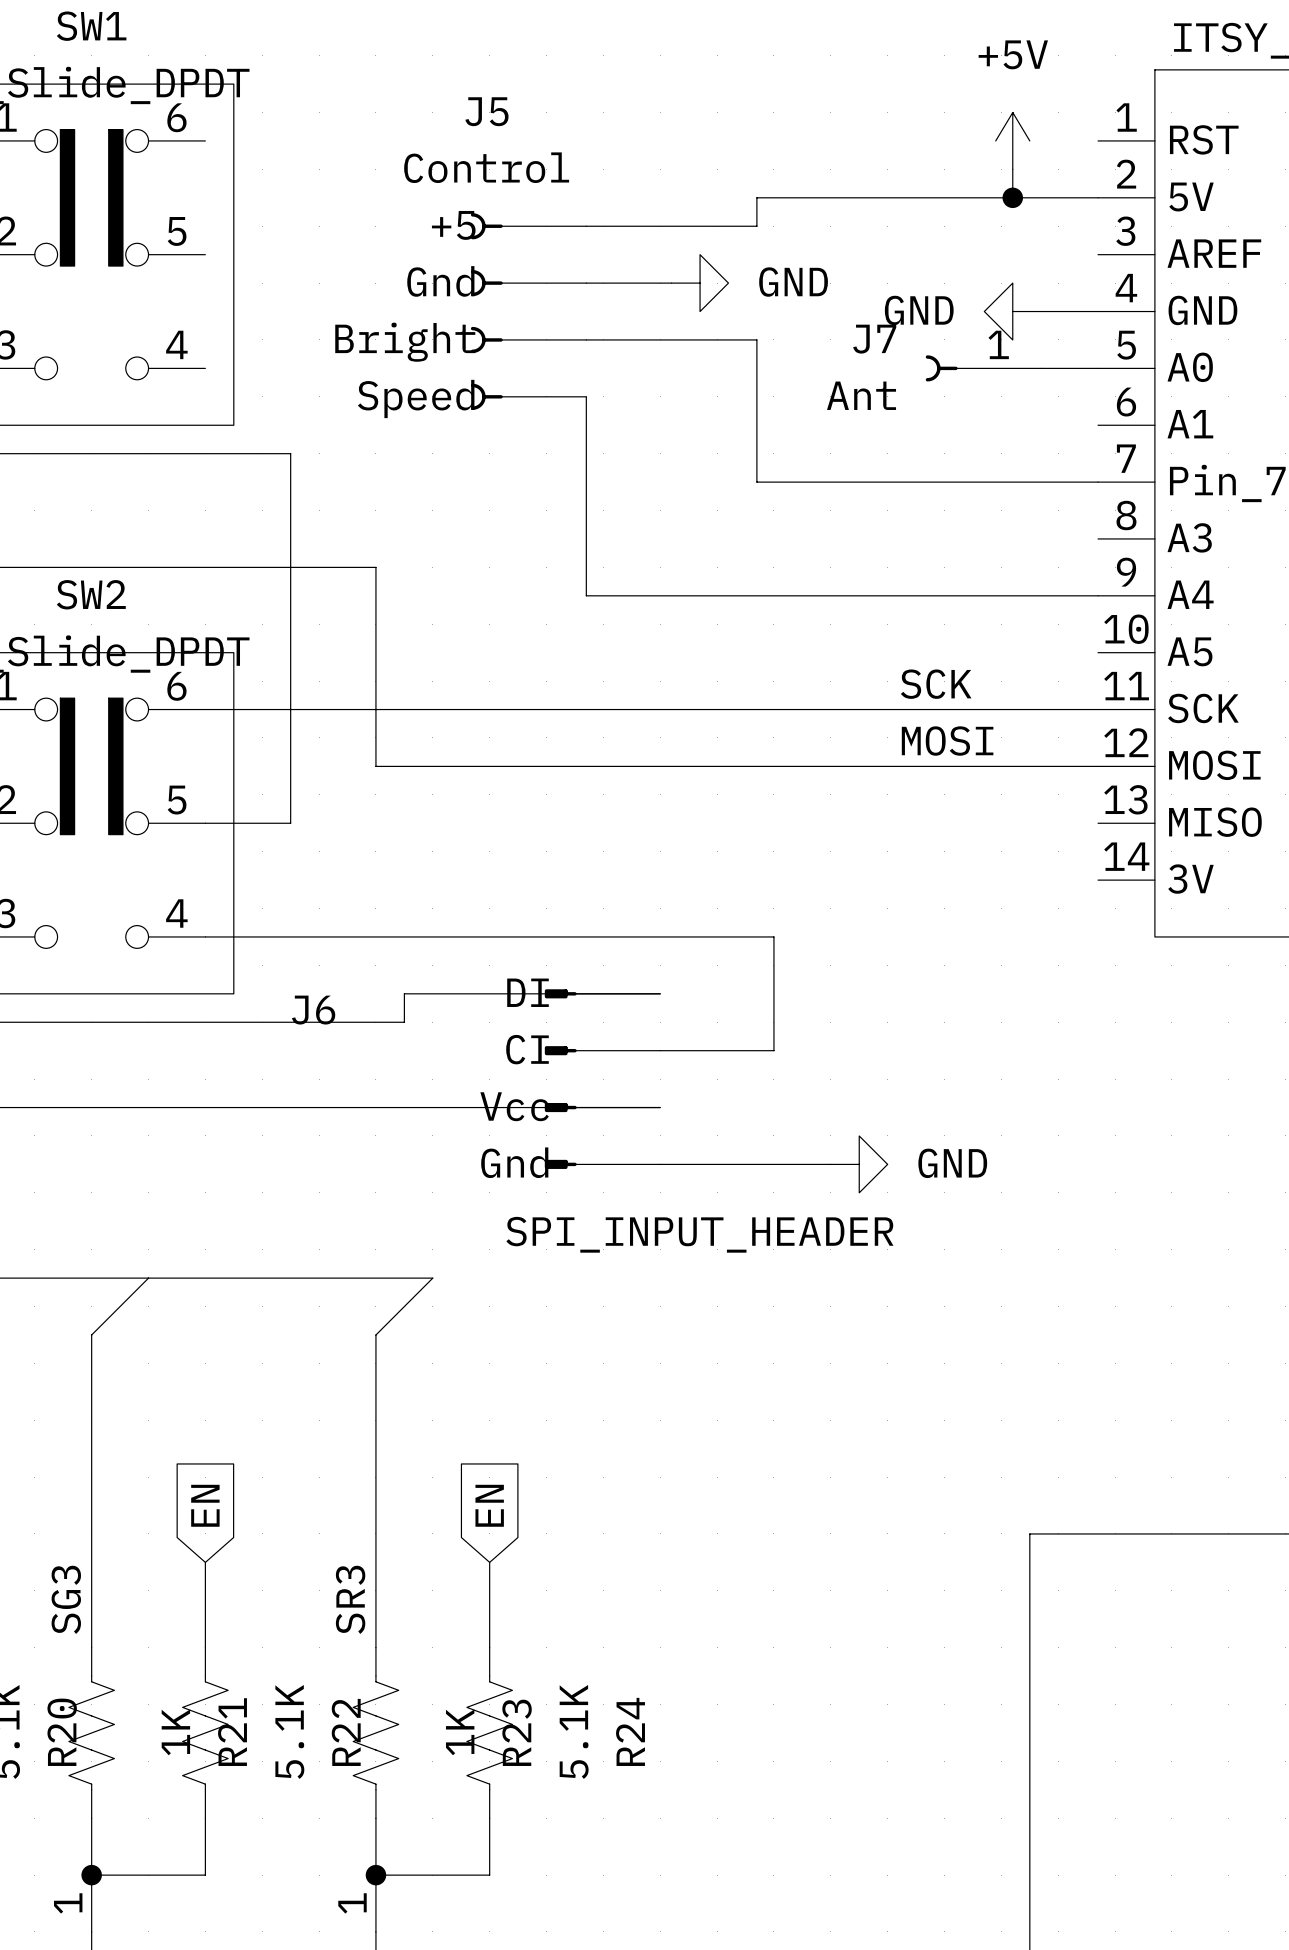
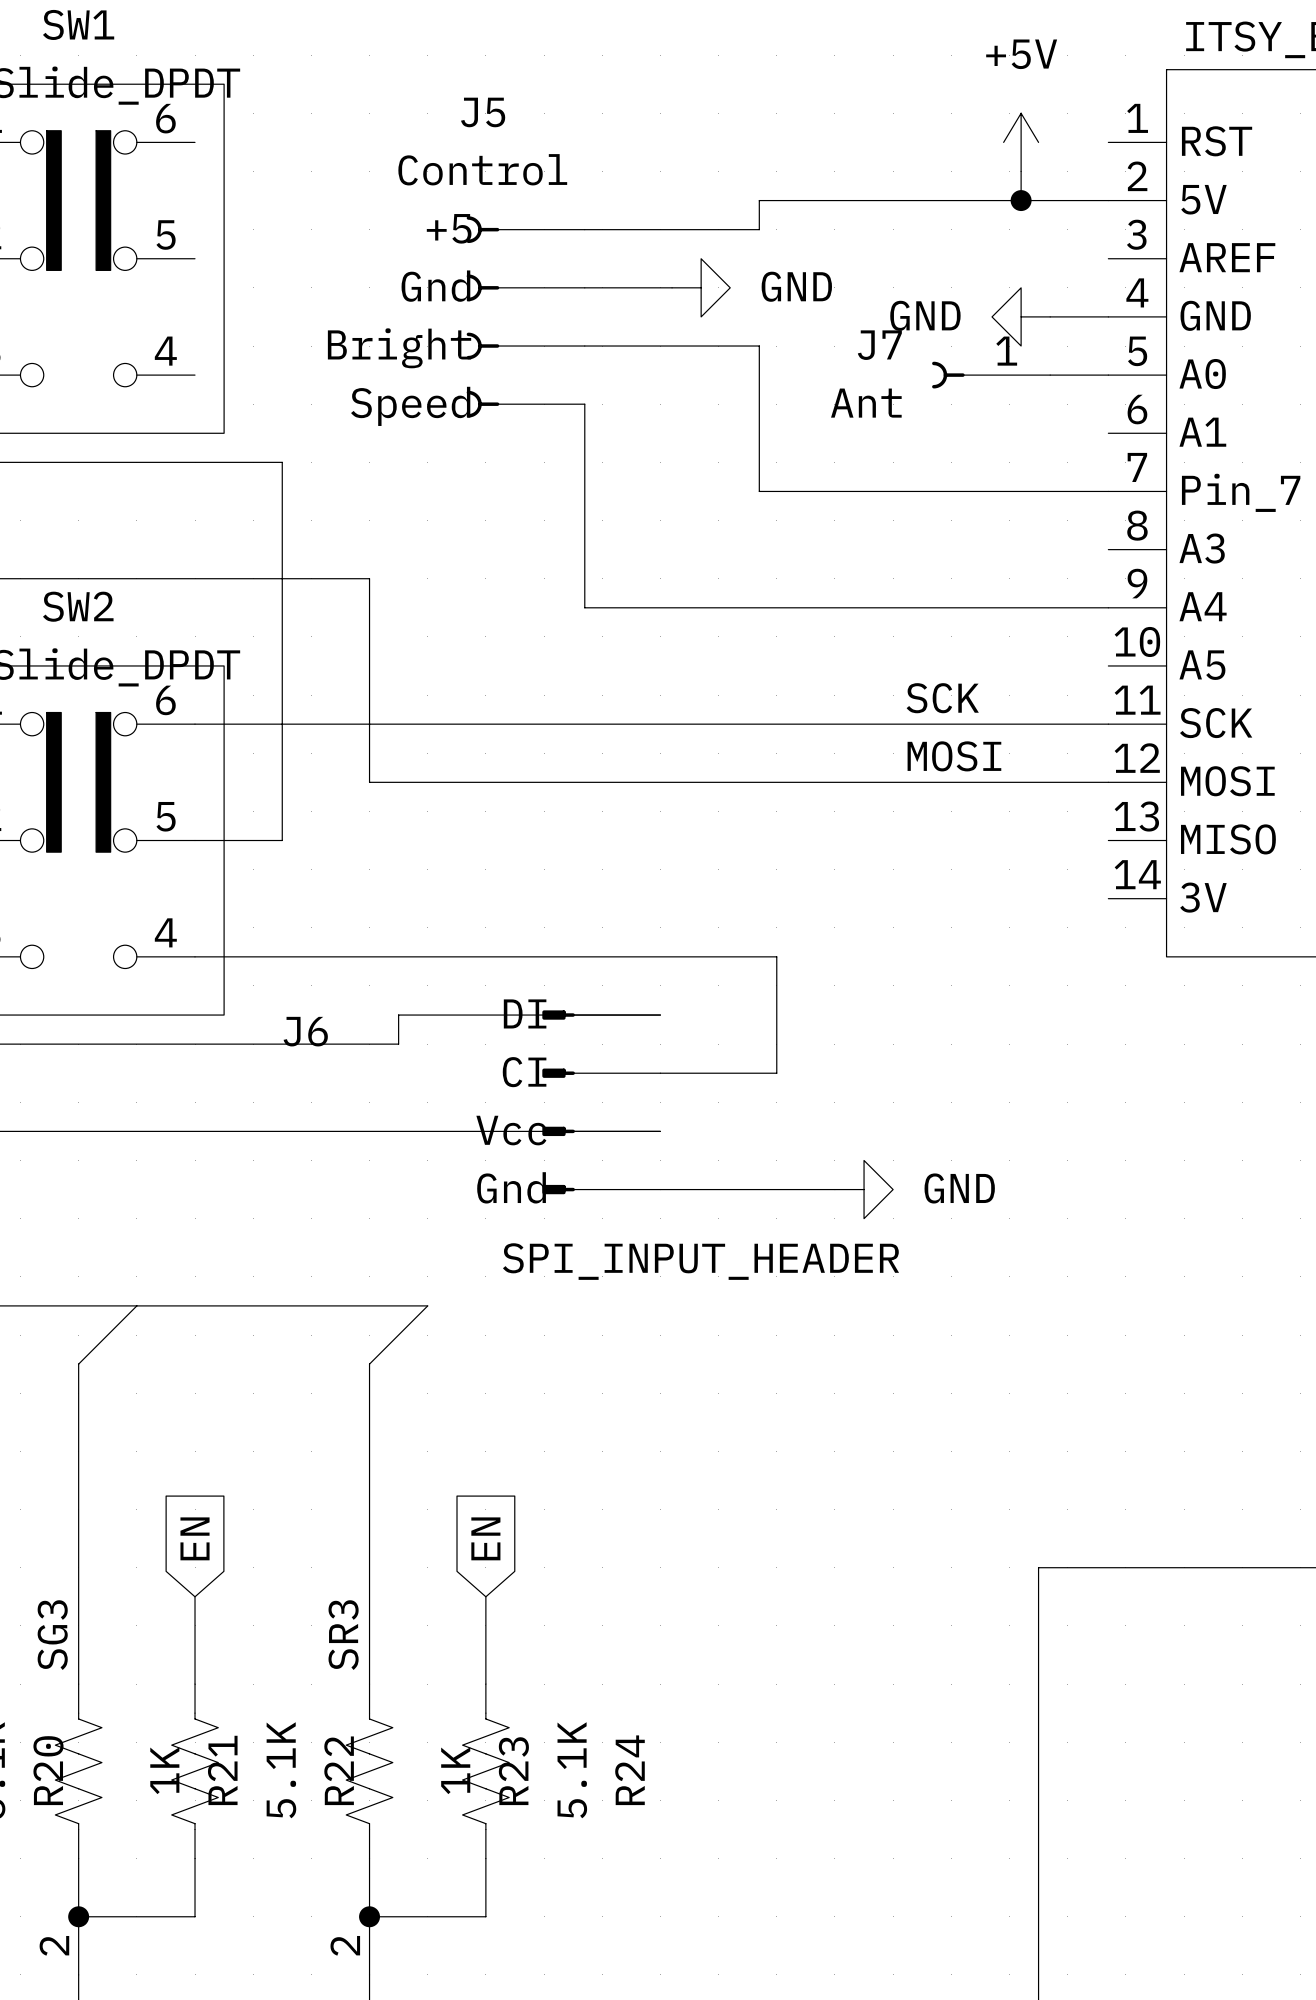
part pin number: 1 (68, 1903) -> 2 (54, 1945)
part pin number: 1 (352, 1903) -> 2 (345, 1945)

